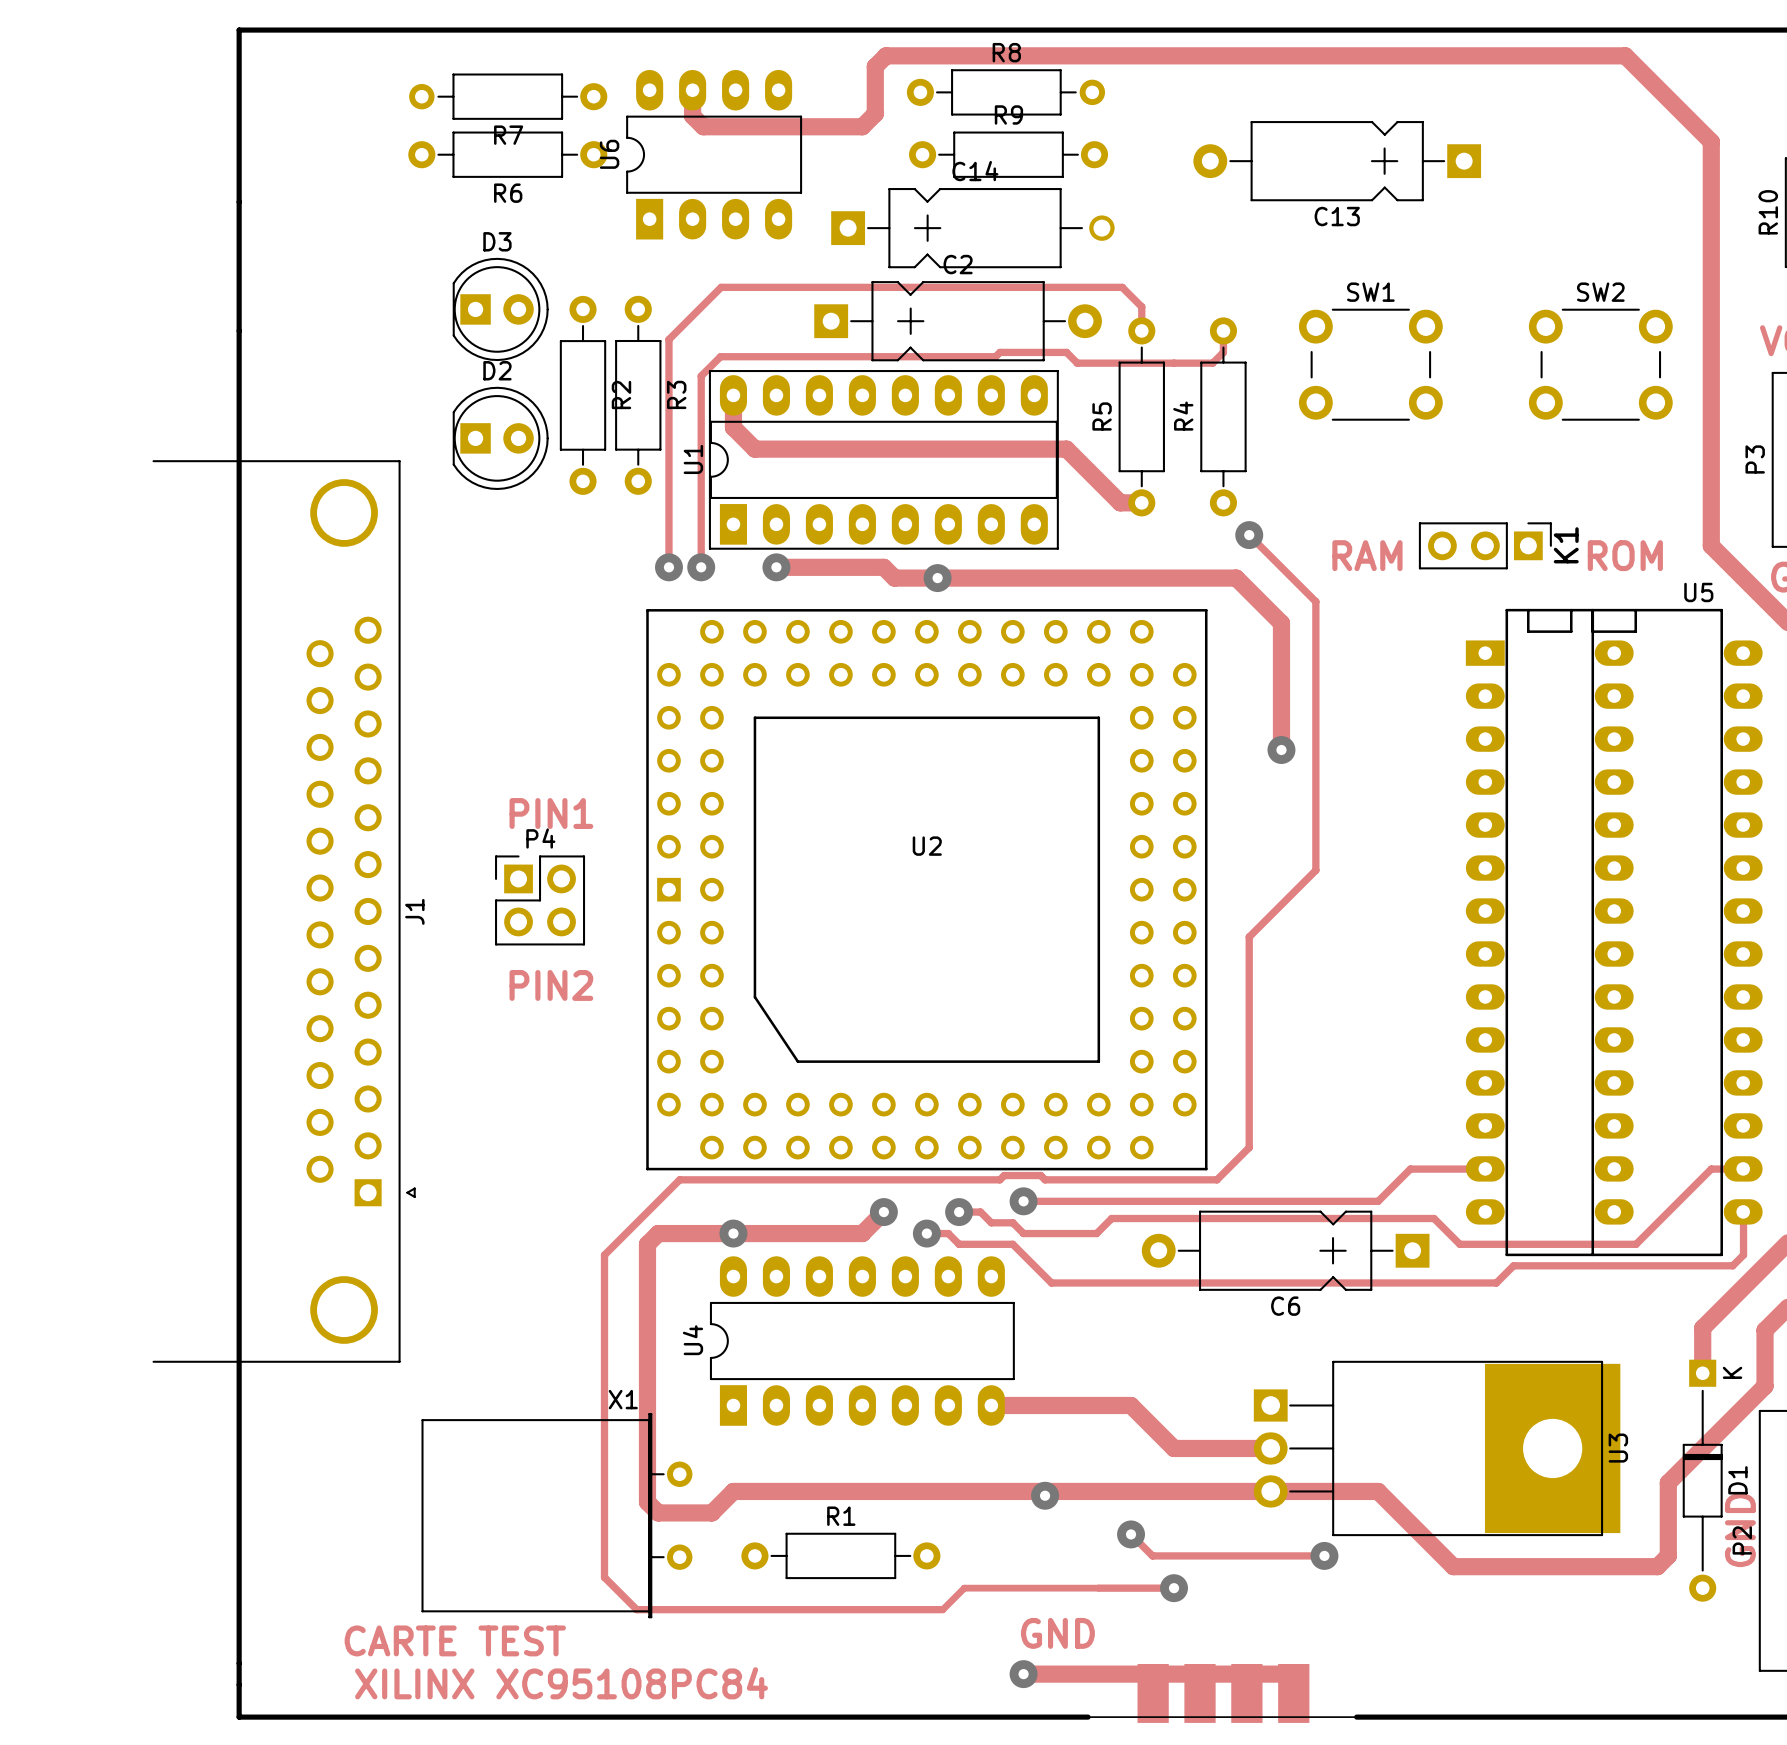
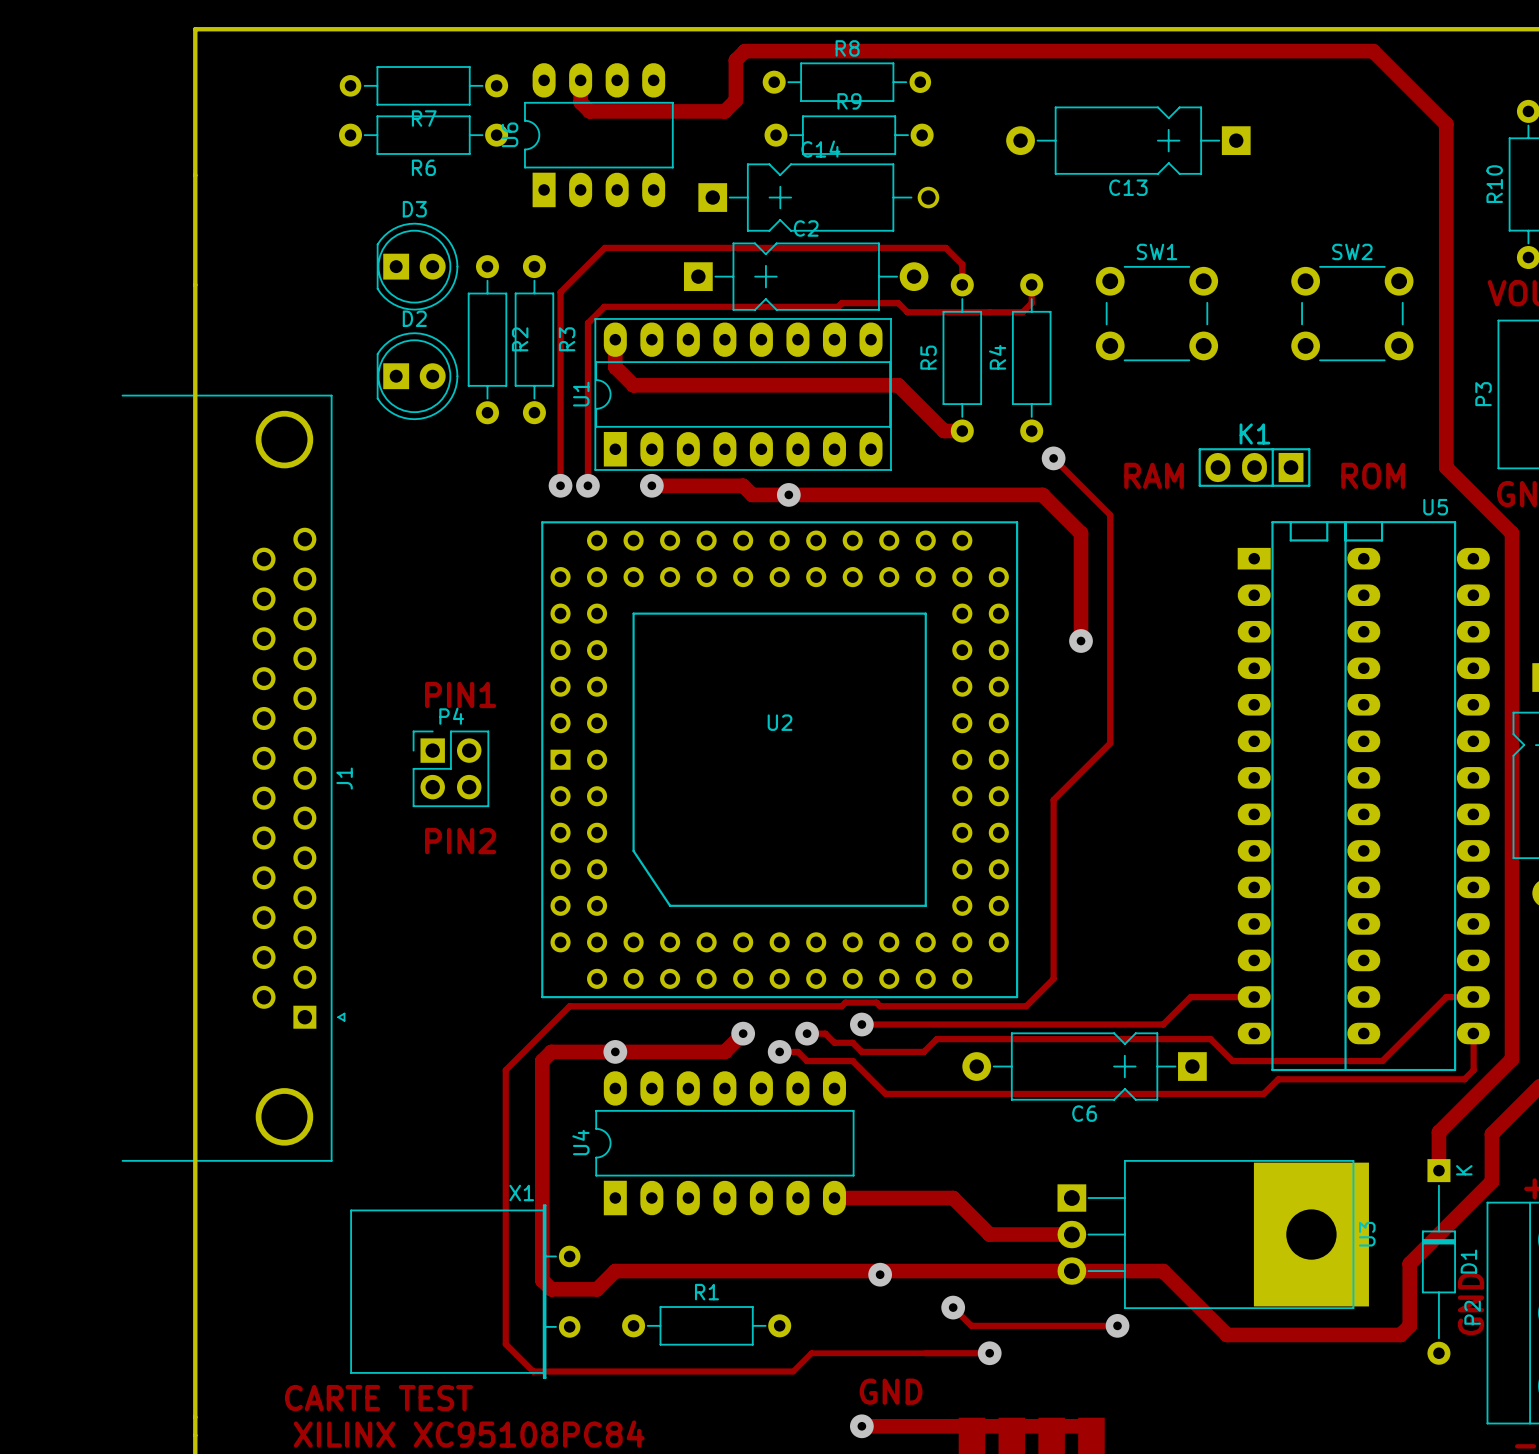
K1 footprint: [1418, 522, 1552, 570] -> [1198, 448, 1311, 487]
K1 name position: K1 (1566, 545) -> K1 (1254, 433)

